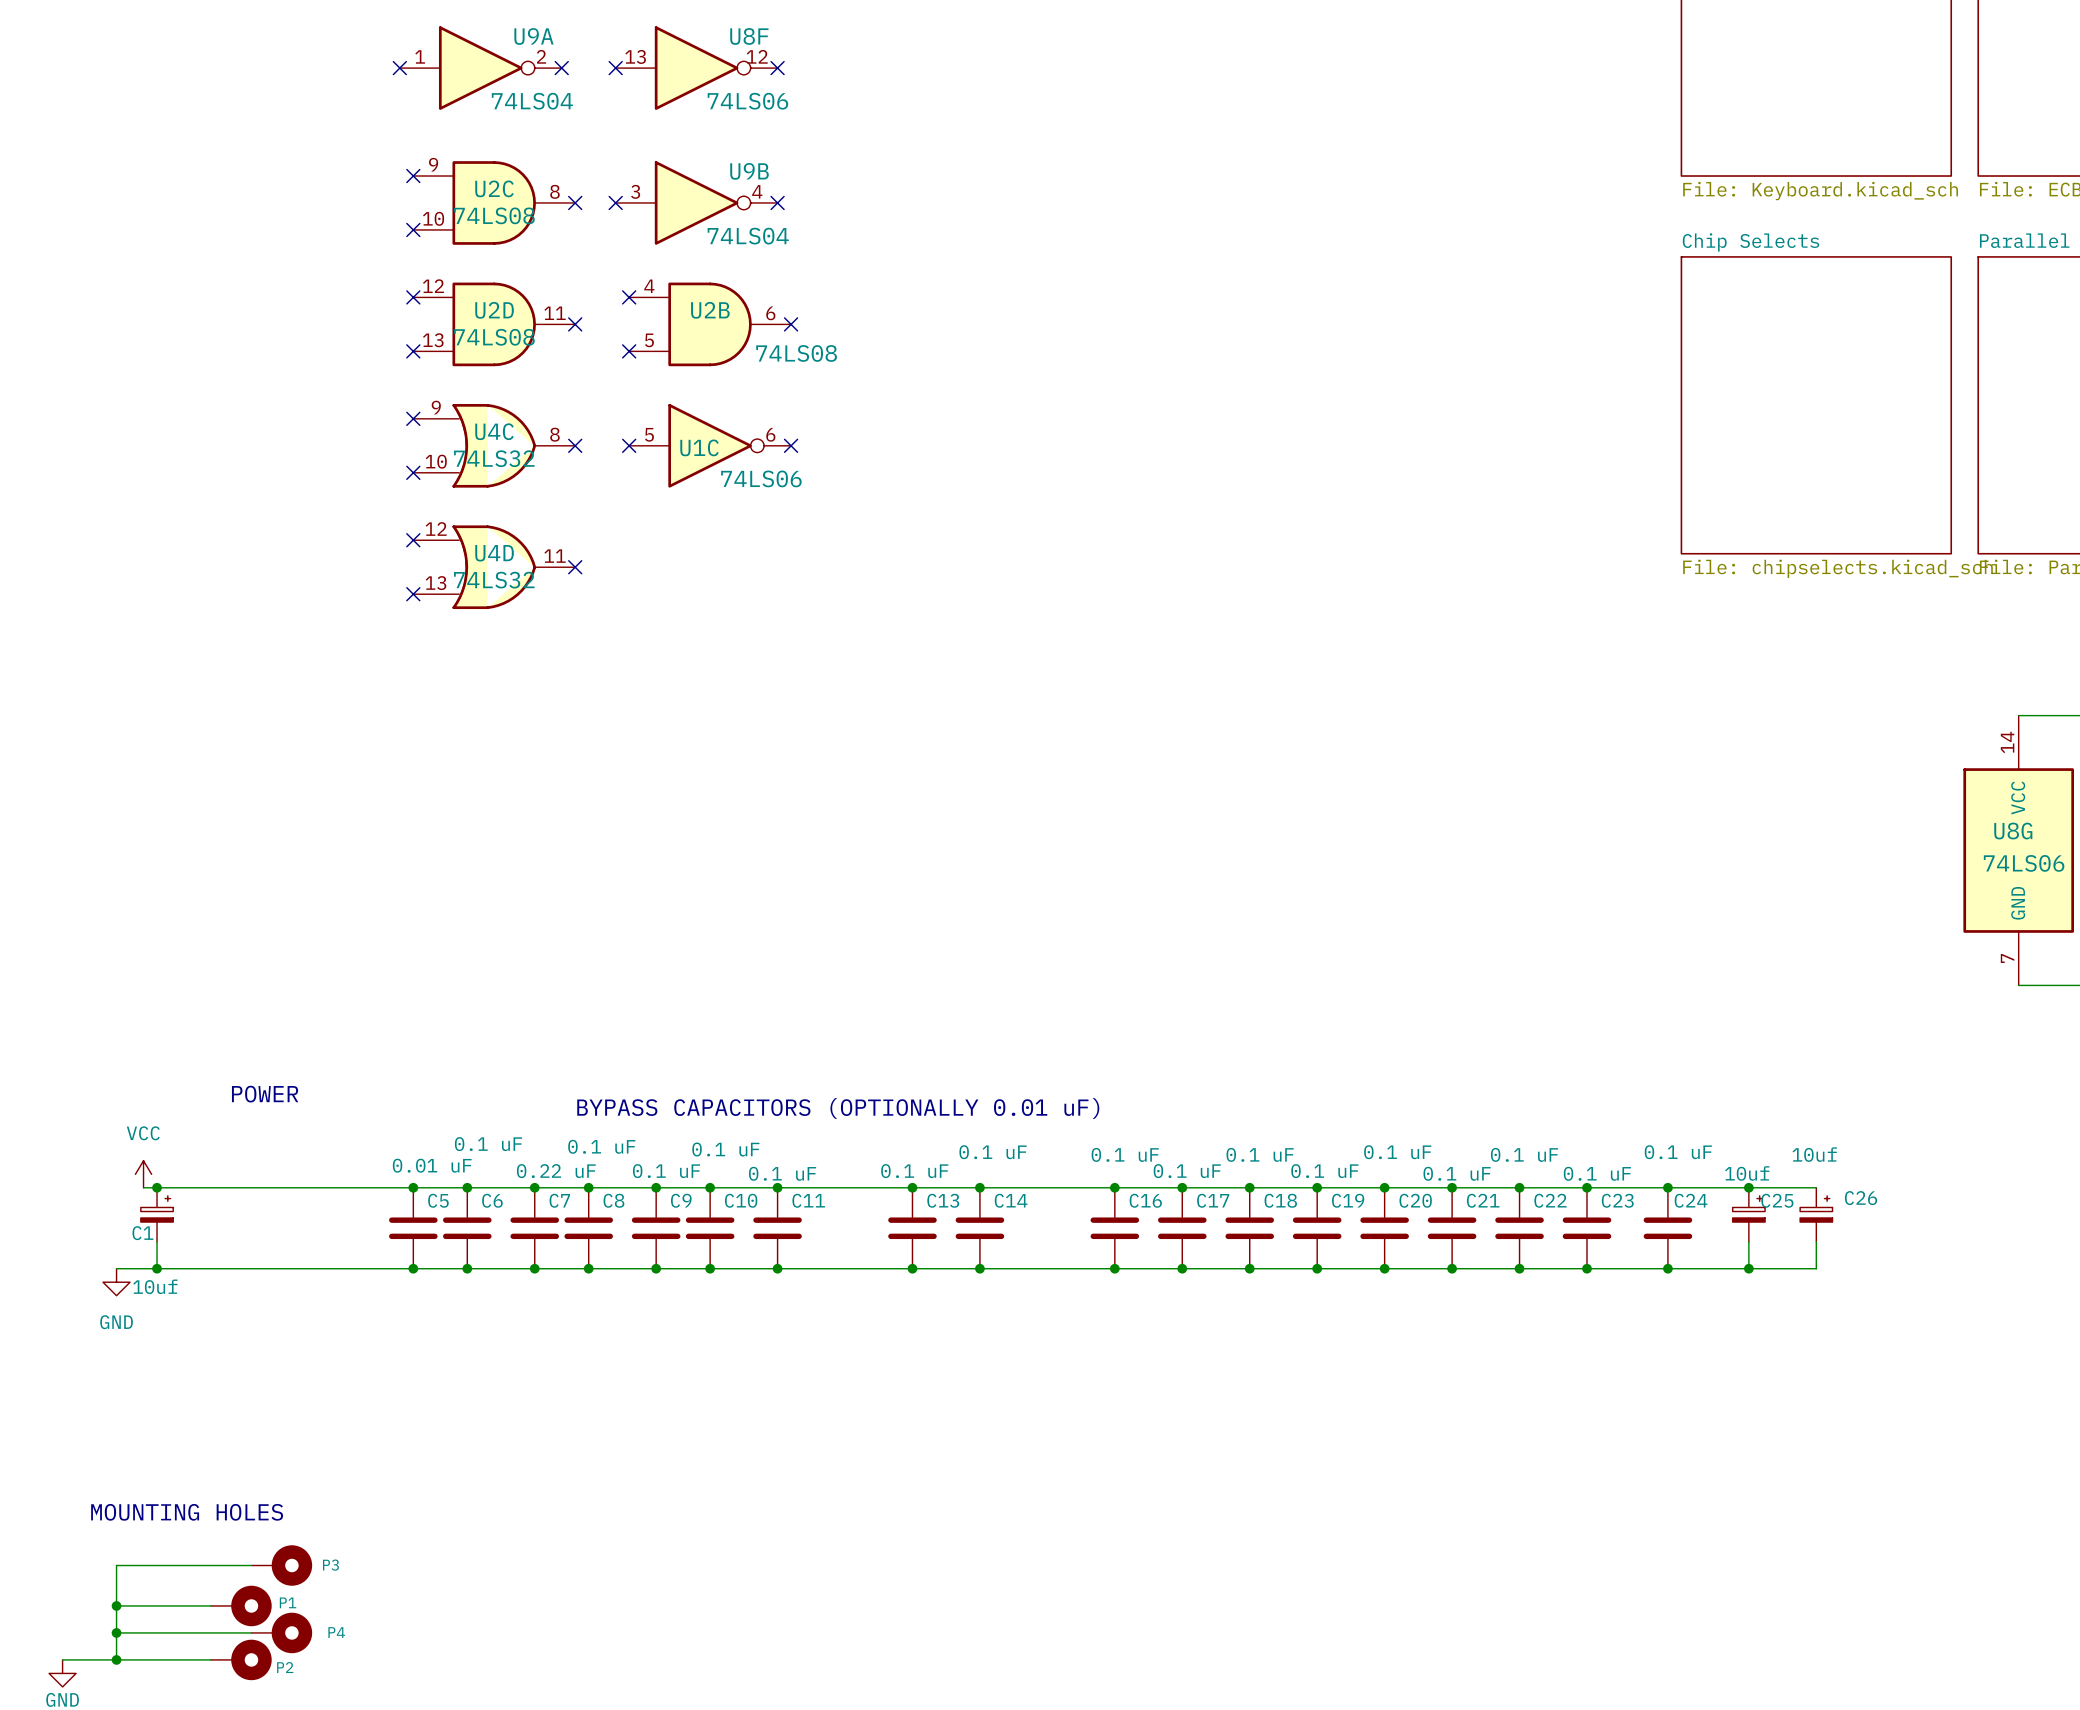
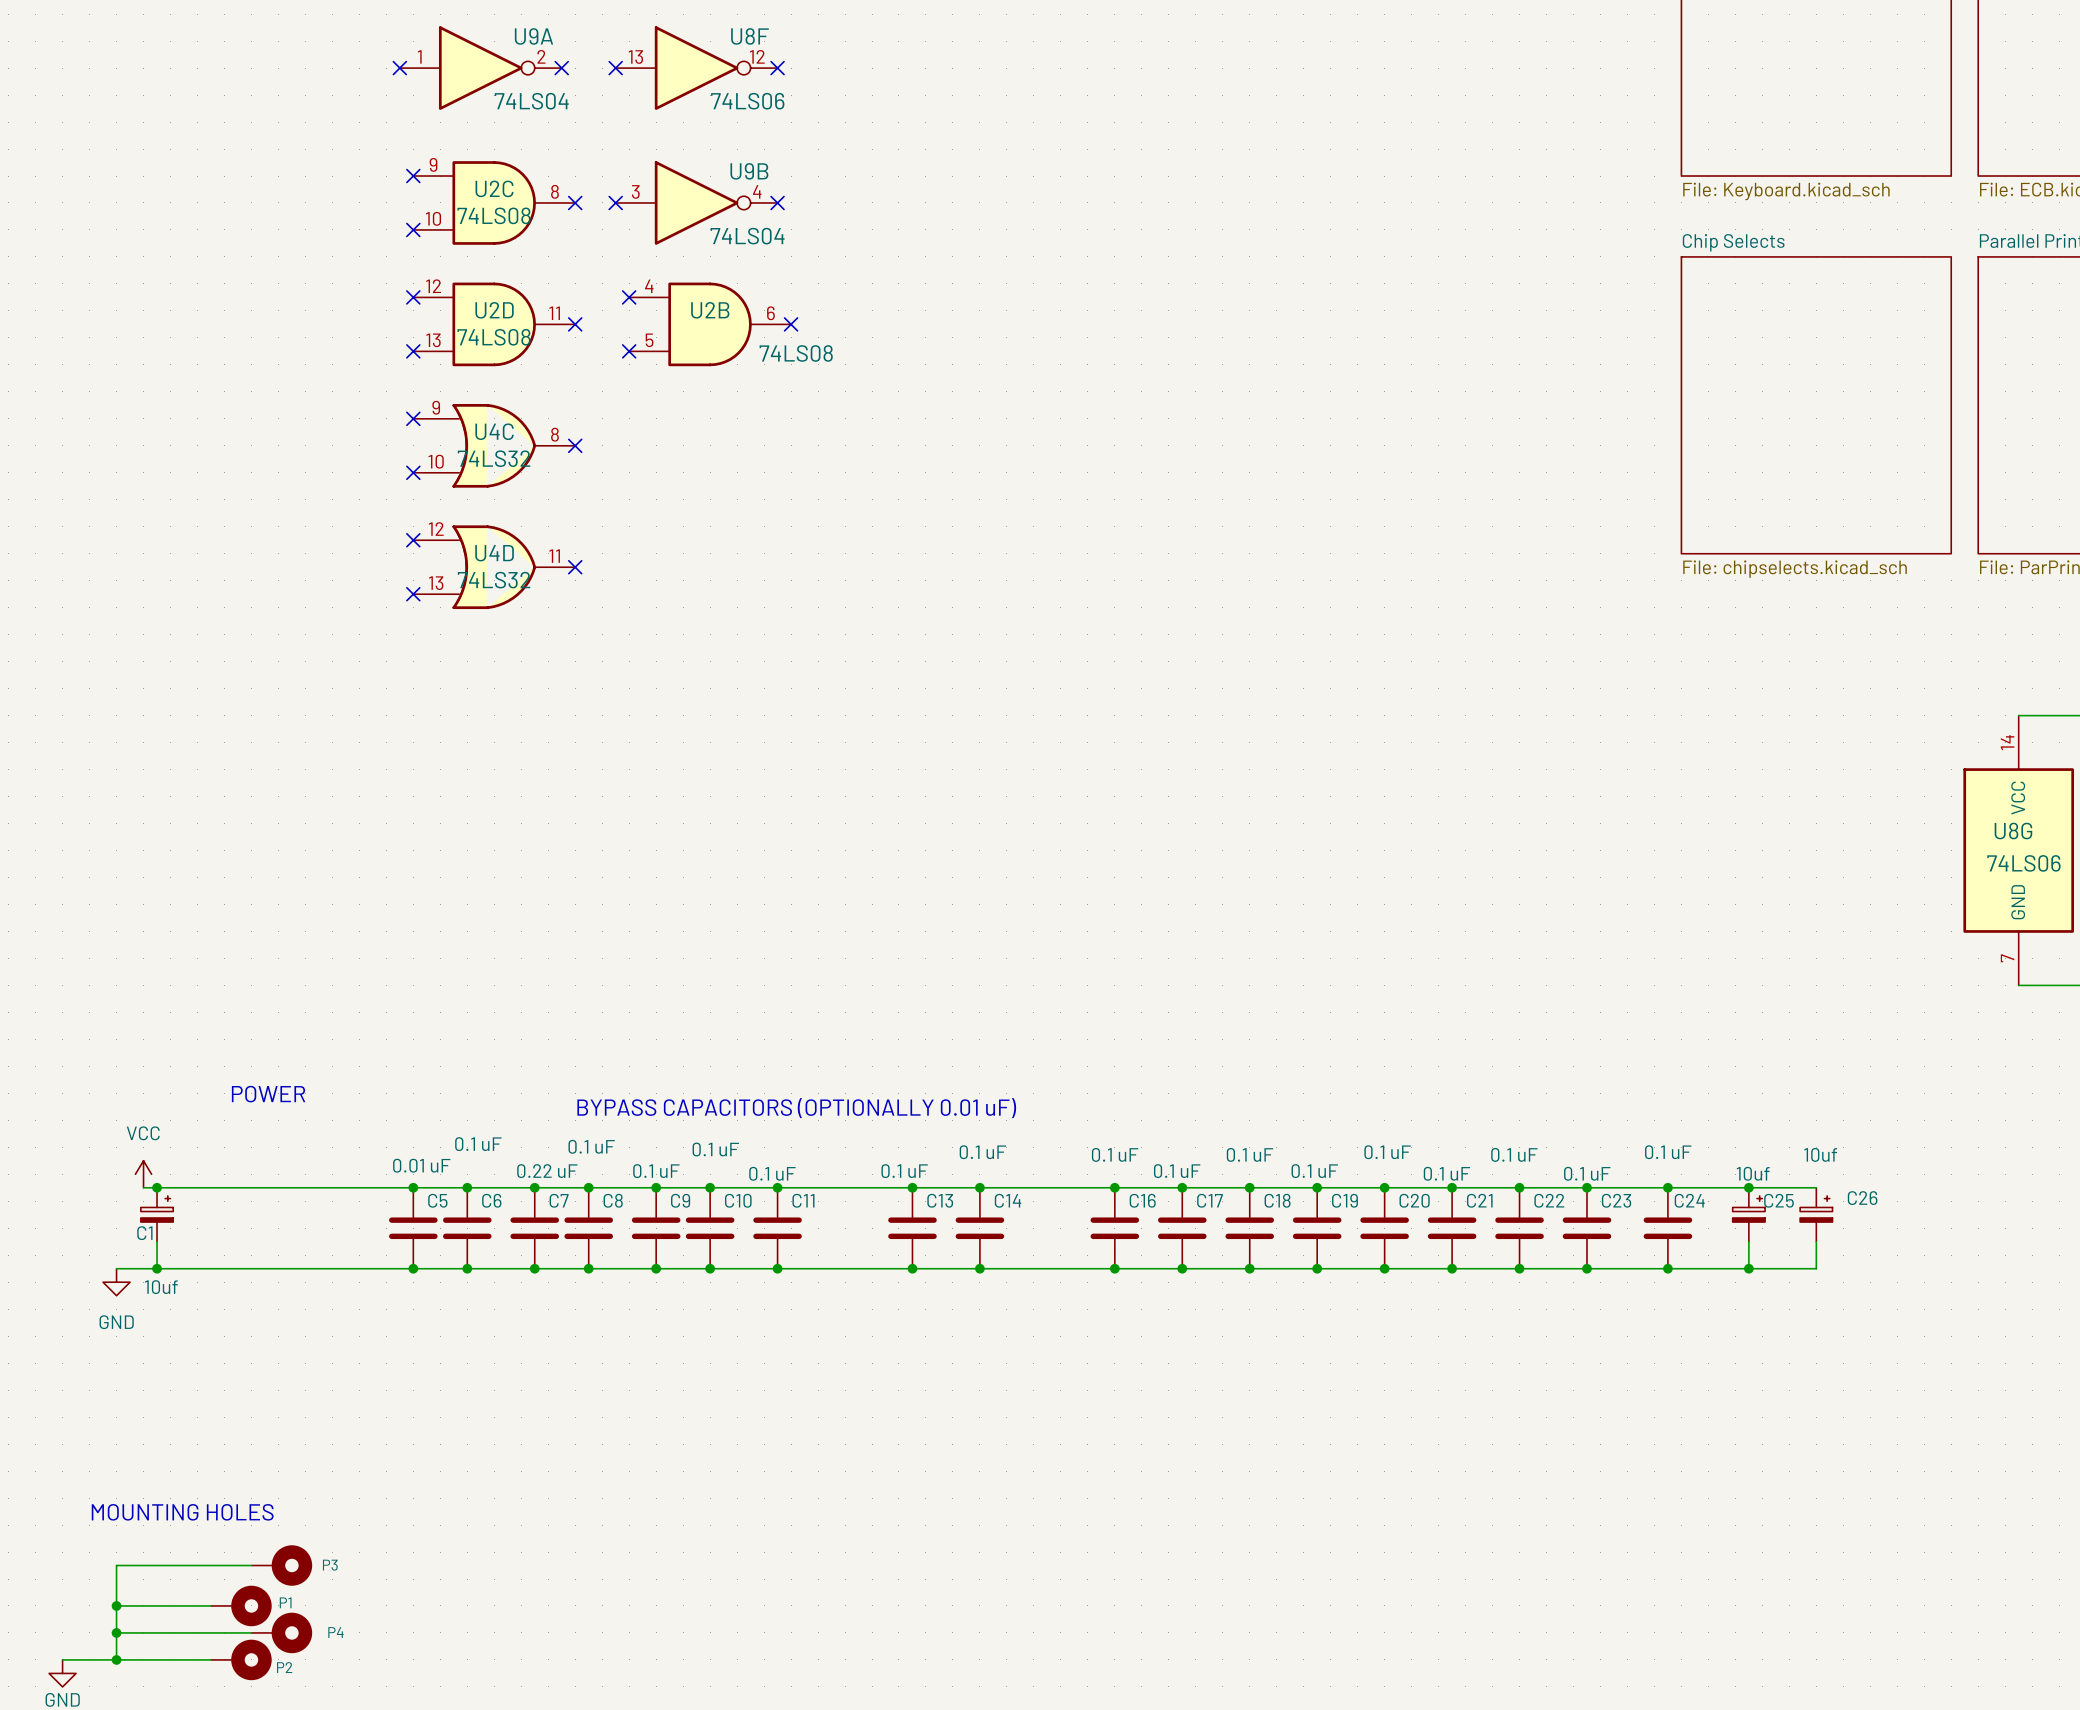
no-connect mark: (629, 445) -> none
U1C: 74LS06 (710, 445) -> none
no-connect mark: (791, 445) -> none

